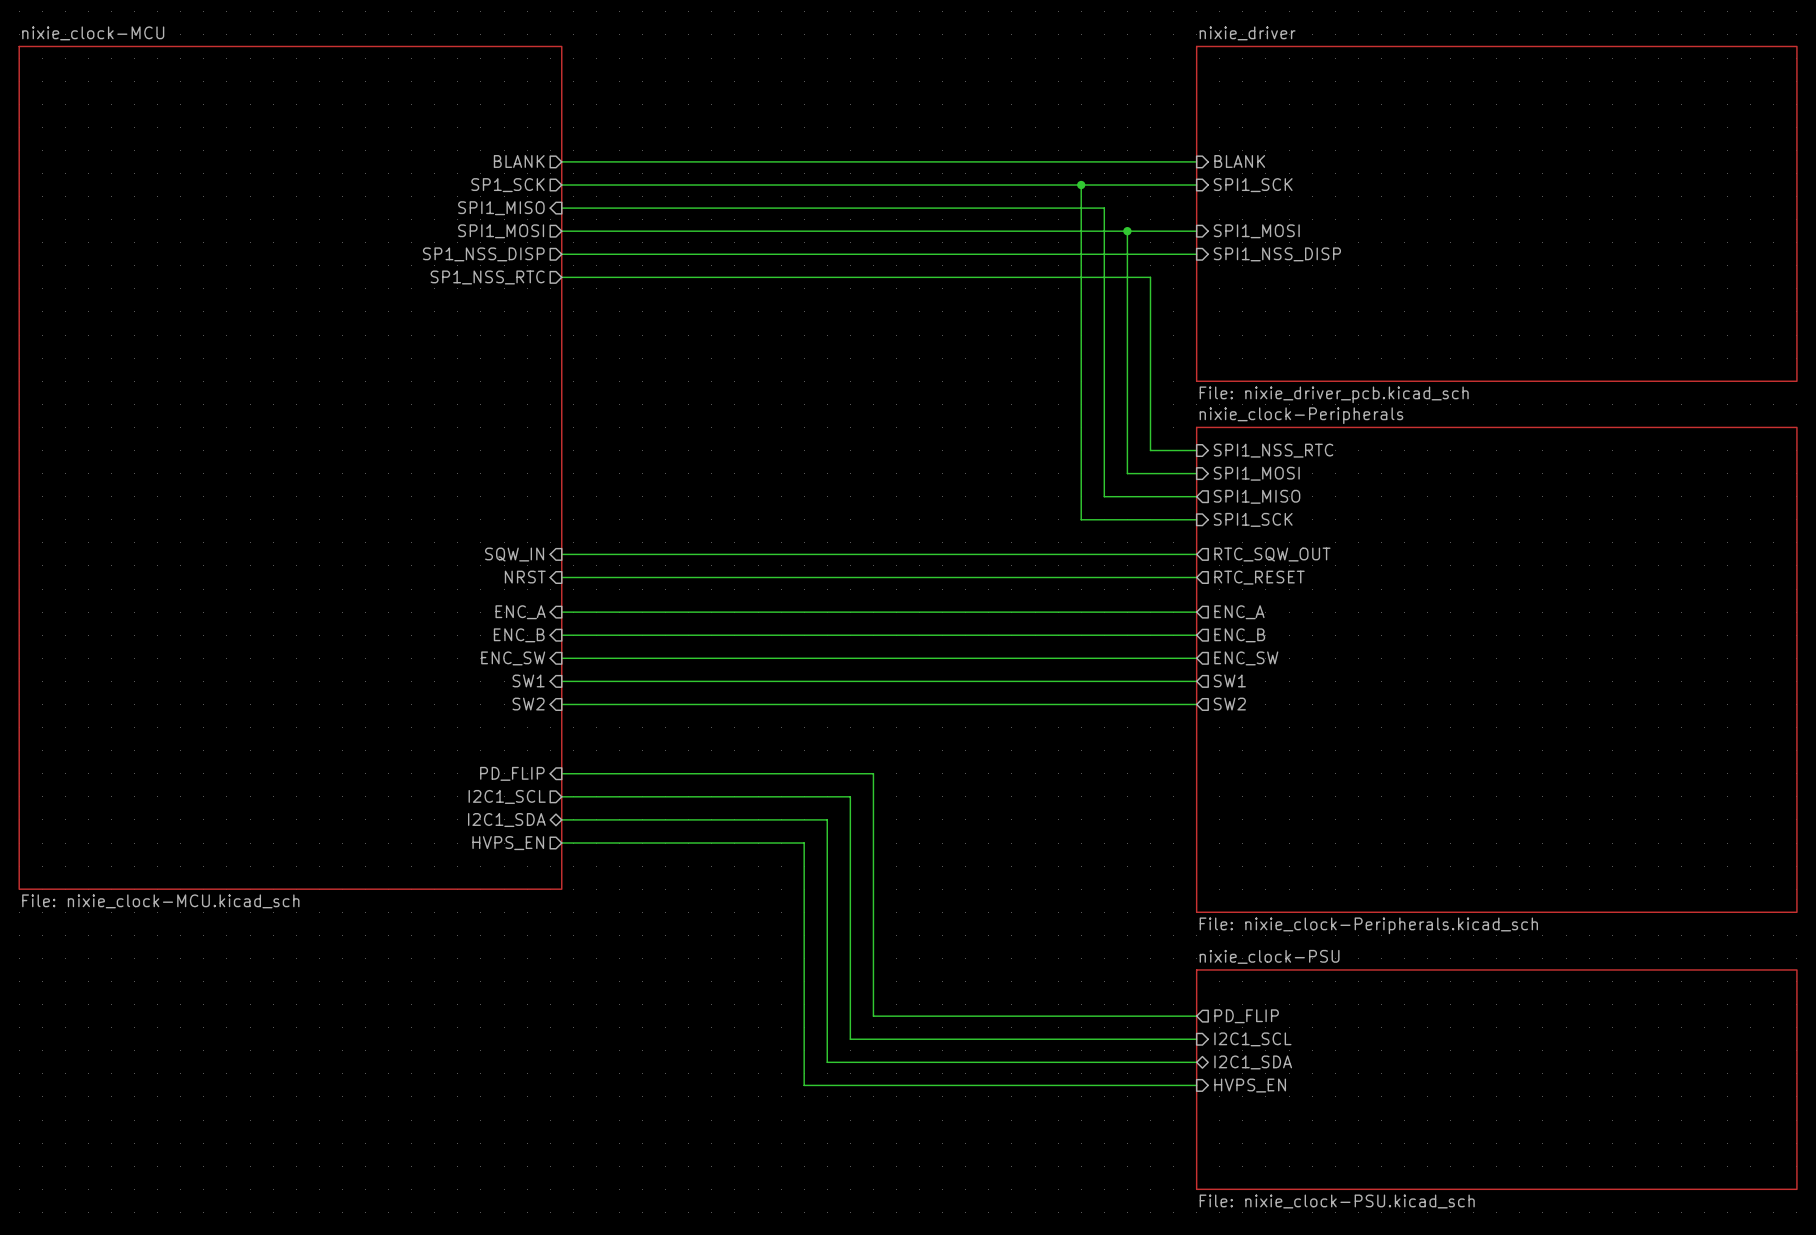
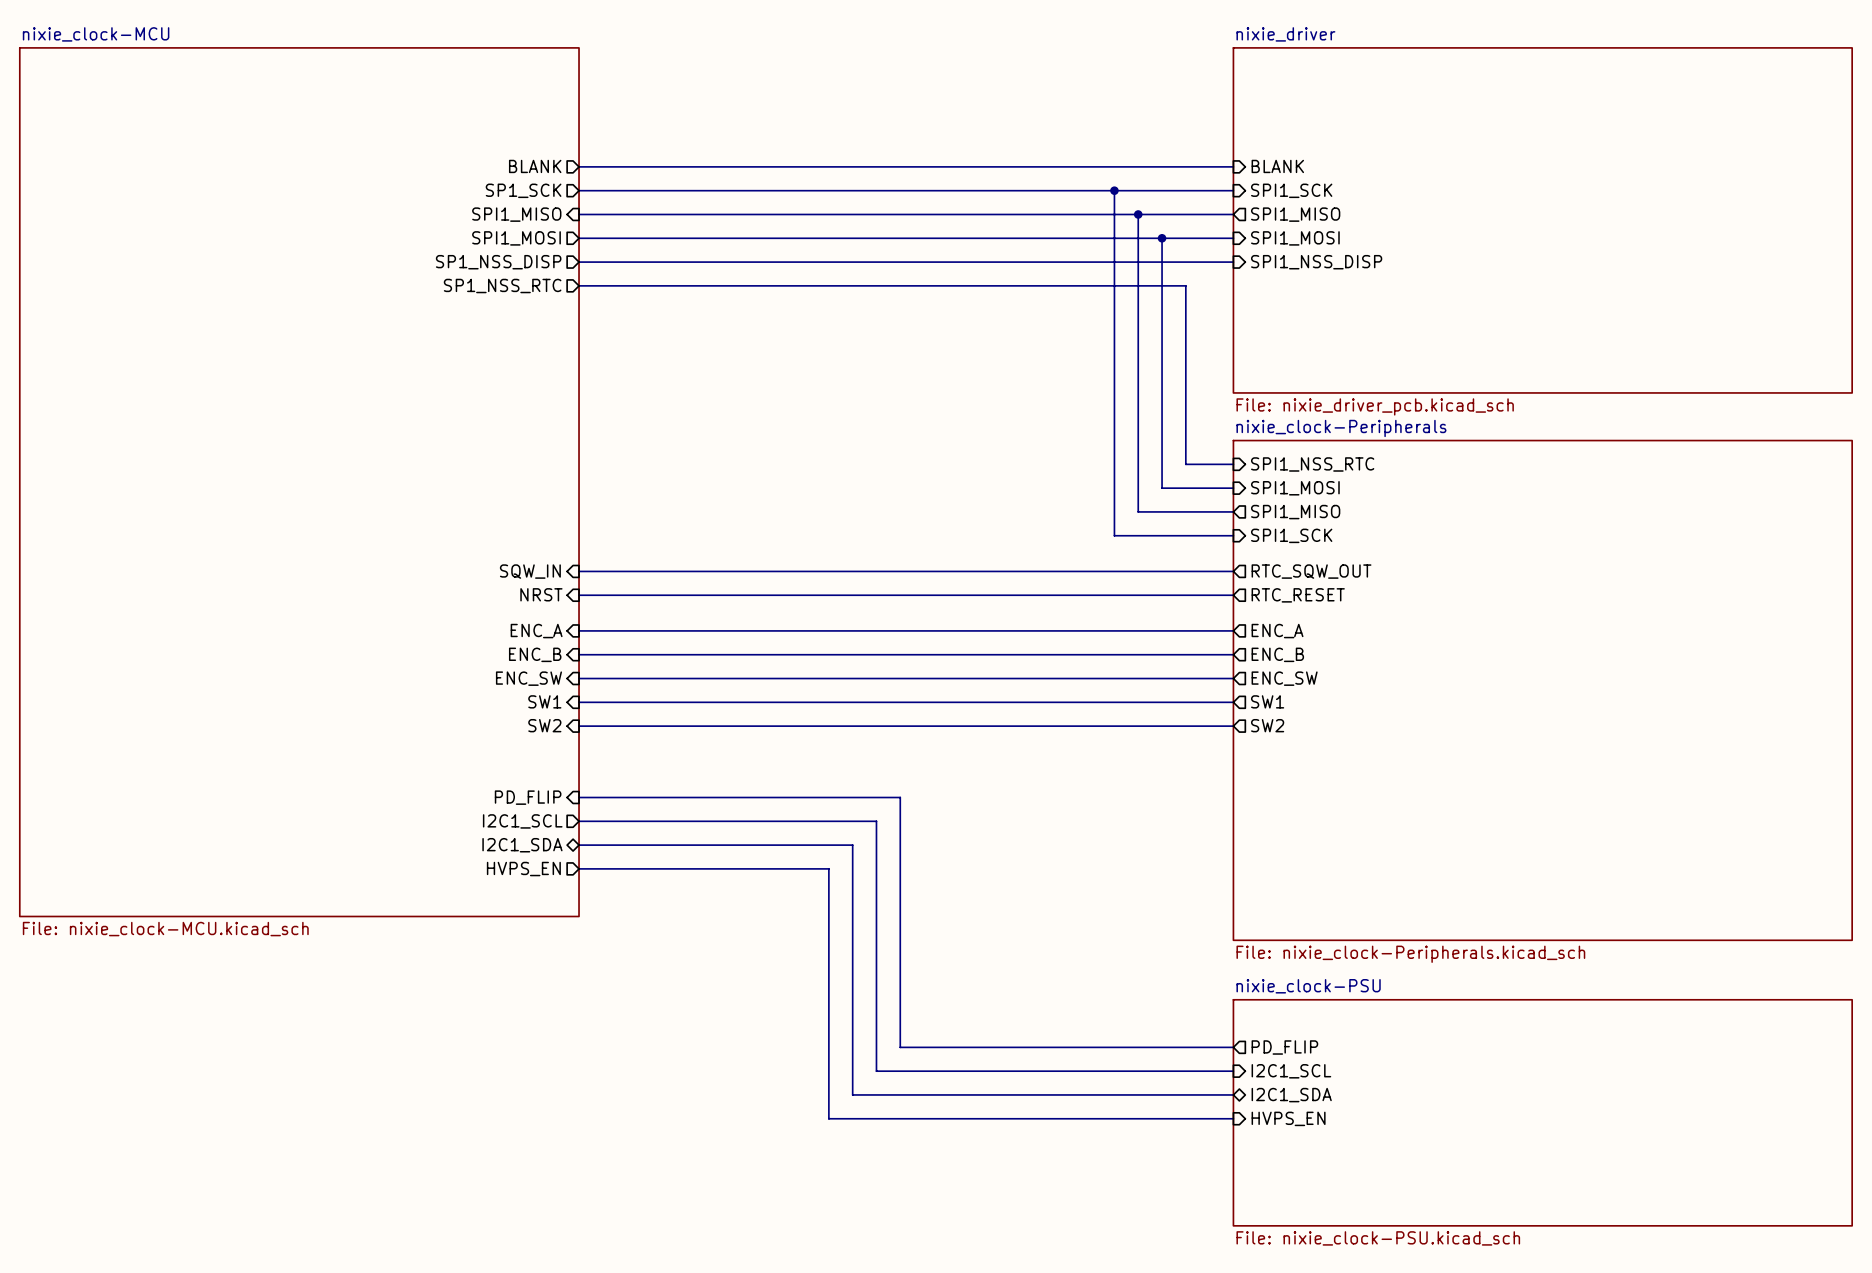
wire: none -> (1138, 214) (1233, 214)
junction: none -> (1138, 214)
sheet pin: none -> SPI1_MISO (1295, 214)

